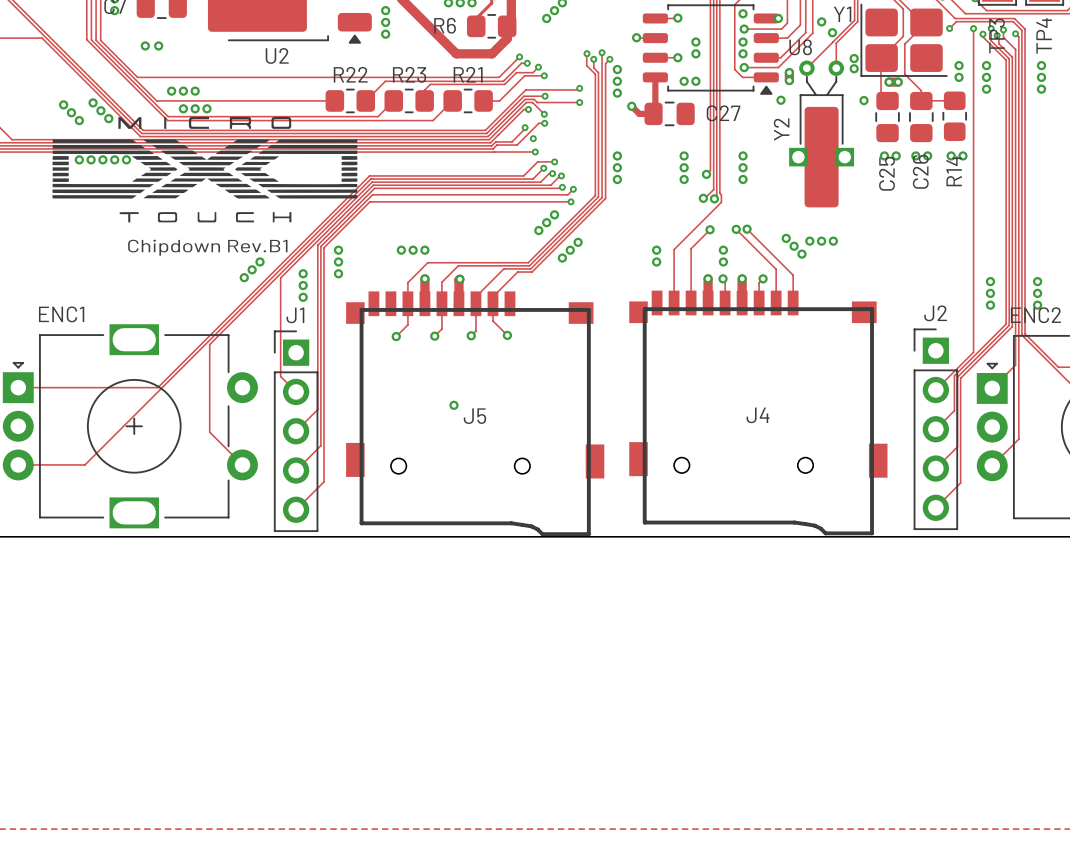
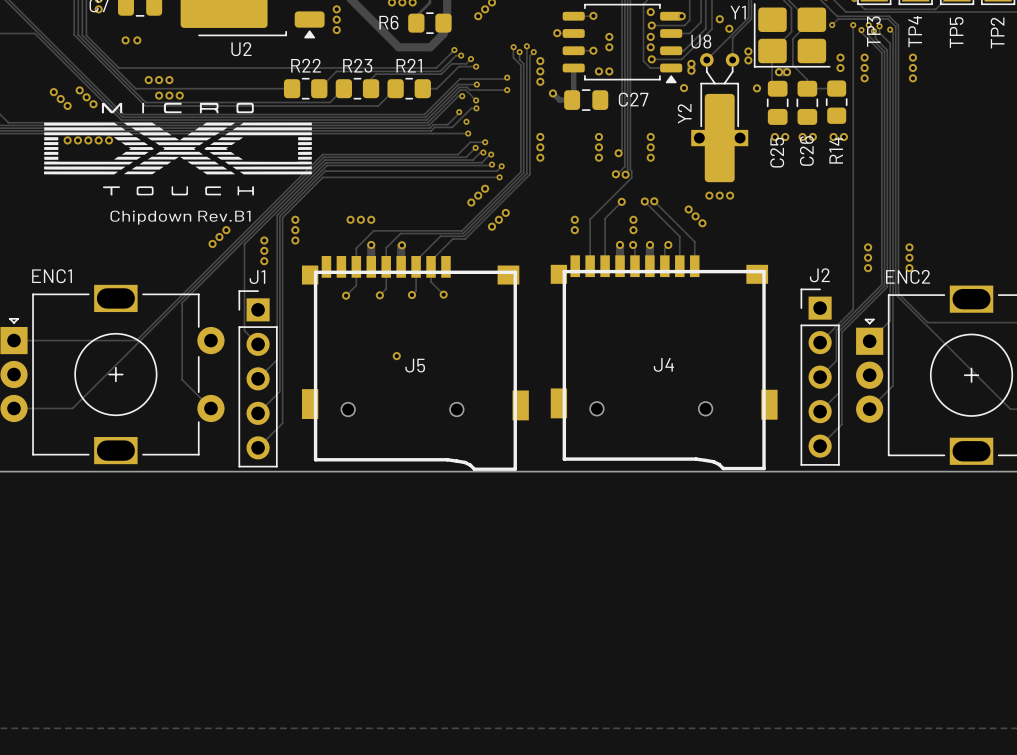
via: none -> (709, 195)
via: none -> (719, 195)
via: none -> (730, 195)
via: (809, 241) -> none
via: (821, 241) -> none
via: (833, 241) -> none

